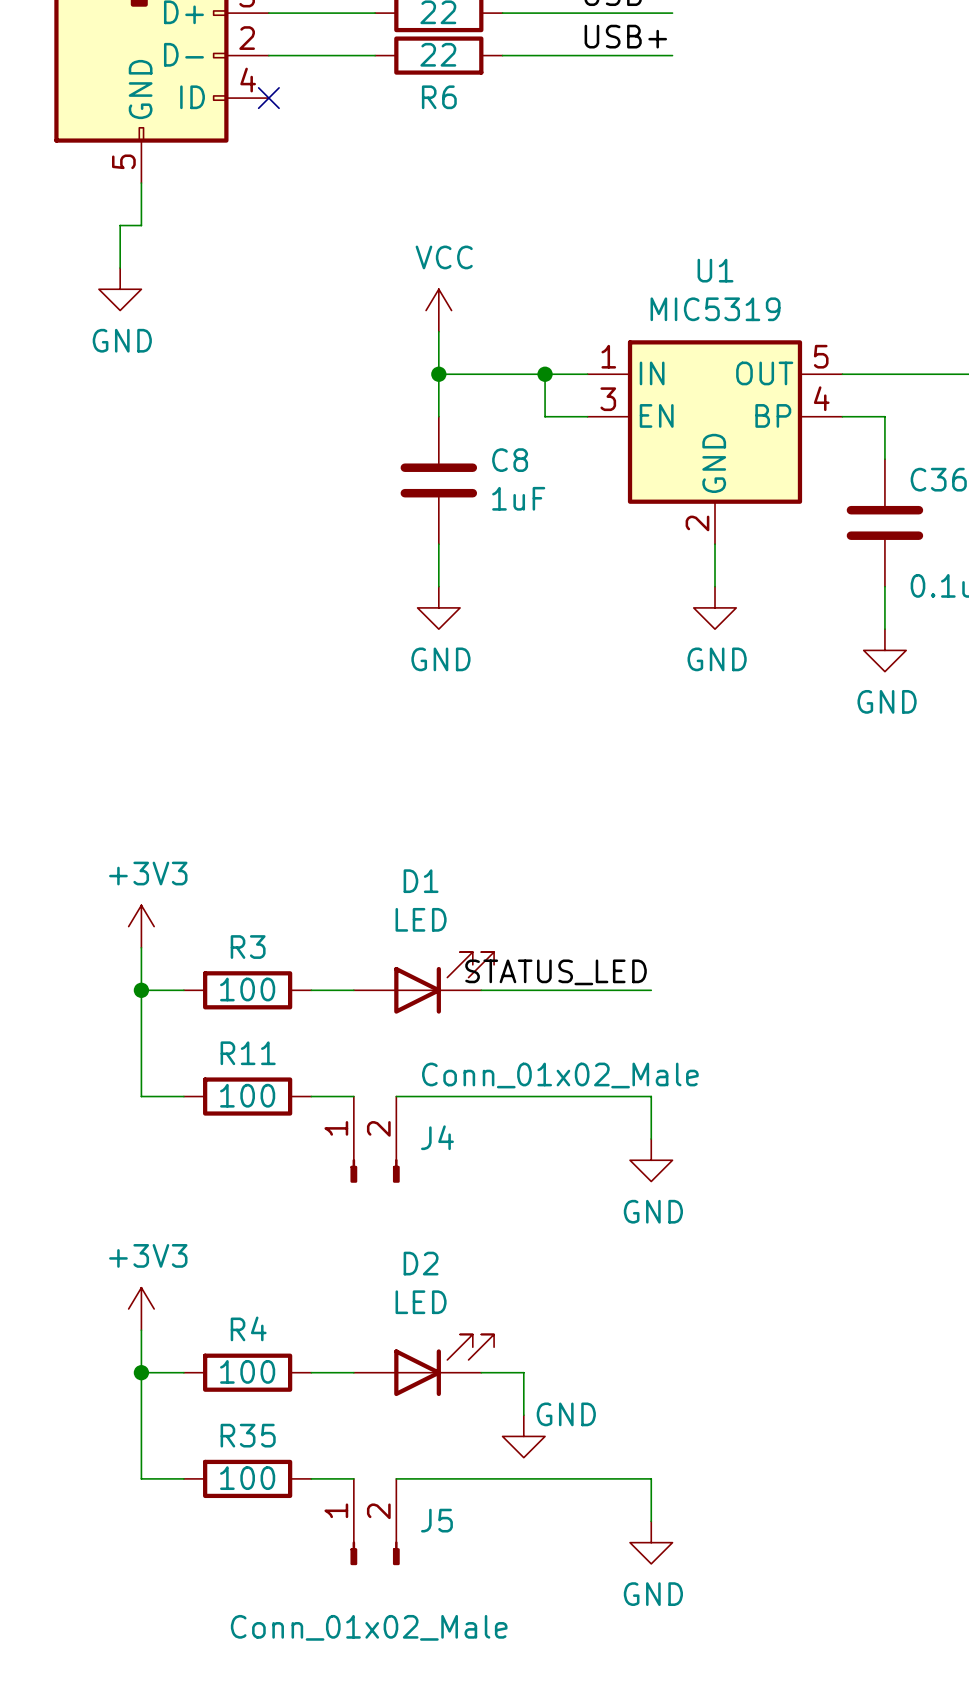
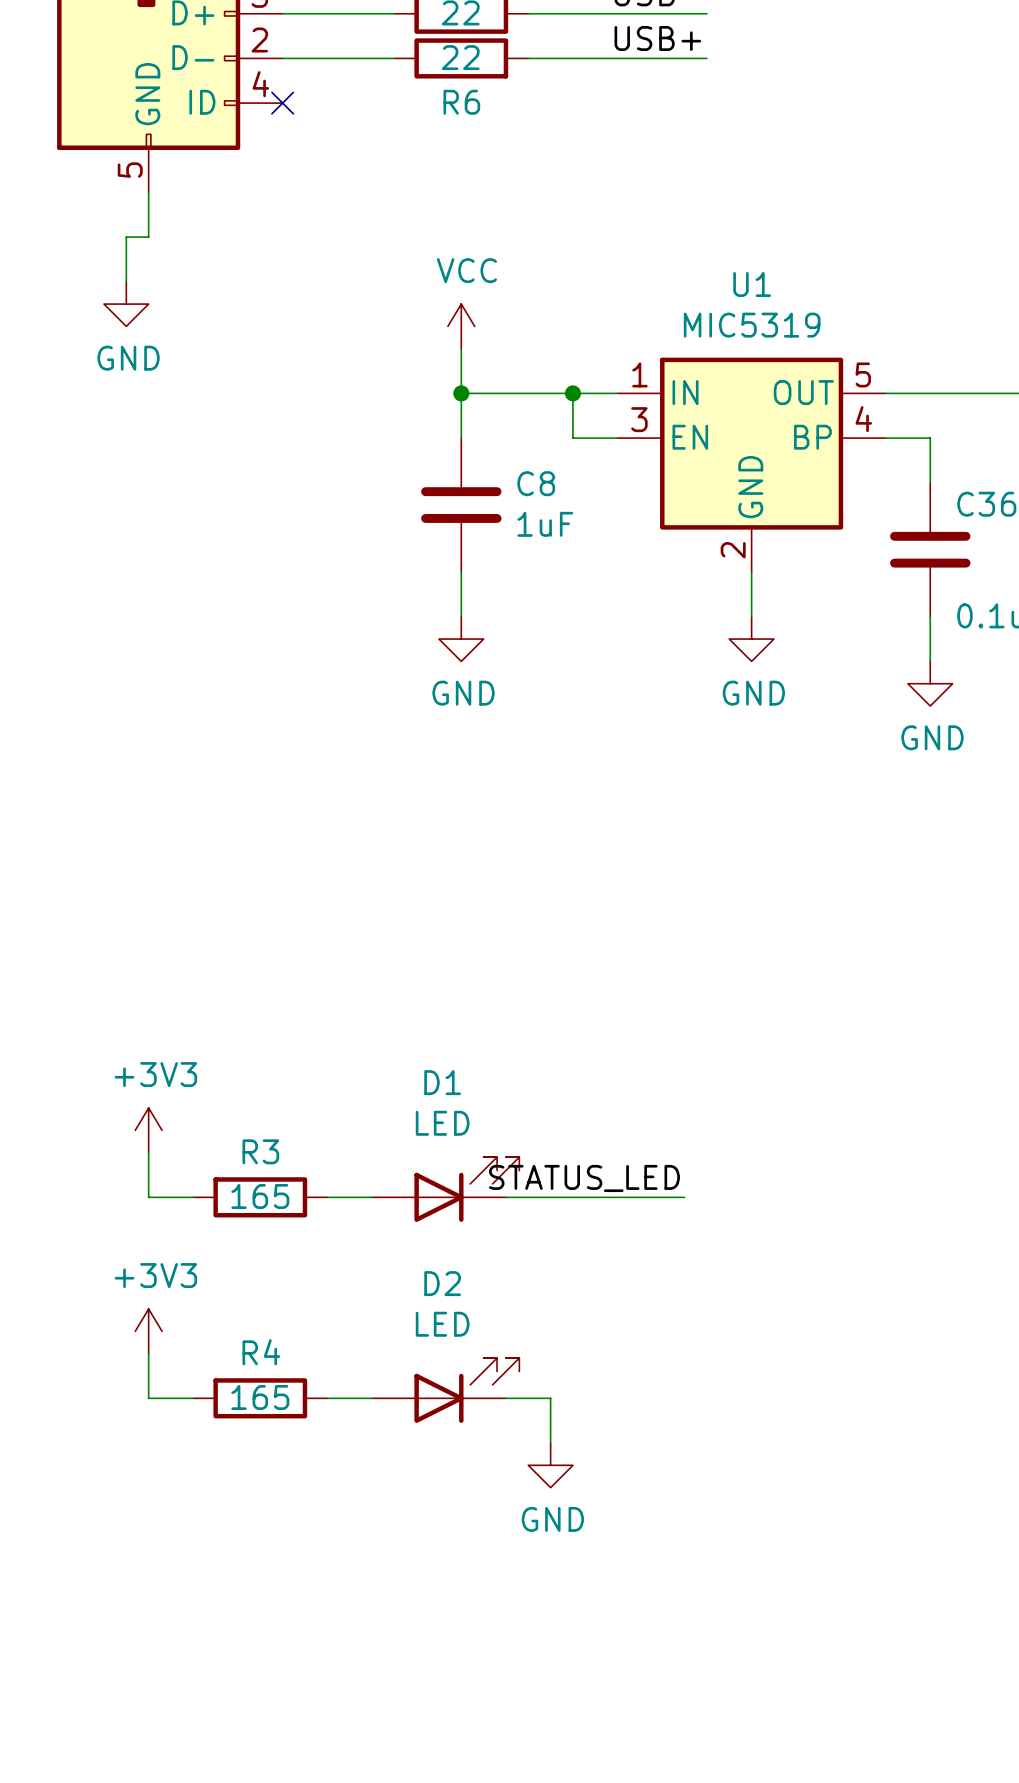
power symbol: +3V3 (141, 926) -> none
wire: (141, 947) (141, 1096) (183, 1096) -> none
label position: STATUS_LED (556, 972) -> STATUS_LED (584, 1178)
D1 position: (423, 982) -> (445, 1189)
R3 value: 100 (247, 989) -> 165 (260, 1196)
wire: (141, 990) (183, 990) -> none
junction: (141, 990) -> none
R3 position: (247, 990) -> (260, 1197)
wire: (311, 990) (353, 990) -> (327, 1197) (371, 1197)
wire: (481, 990) (651, 990) -> none
power symbol: none -> +3V3 (148, 1130)
wire: none -> (148, 1152) (148, 1197) (193, 1197)
R11: 100 (247, 1096) -> none
wire: (311, 1096) (353, 1096) -> none
wire: (396, 1096) (651, 1096) (651, 1139) -> (505, 1197) (684, 1197)
J4: Conn_01x02_Male (375, 1139) -> none
power symbol: GND (651, 1160) -> none
wire: none -> (148, 1353) (148, 1398) (193, 1398)
power symbol position: +3V3 (141, 1308) -> +3V3 (148, 1331)
wire: (141, 1330) (141, 1478) (183, 1478) -> none
D2 position: (423, 1365) -> (445, 1390)
R4 value: 100 (247, 1371) -> 165 (260, 1397)
wire: (141, 1372) (183, 1372) -> none
junction: (141, 1372) -> none
R4 position: (247, 1372) -> (260, 1398)
wire: (311, 1372) (353, 1372) -> (327, 1398) (371, 1398)
wire: (481, 1372) (523, 1372) (523, 1415) -> (505, 1398) (550, 1398) (550, 1442)
power symbol text position: GND (566, 1414) -> GND (552, 1519)
power symbol position: GND (523, 1436) -> GND (550, 1465)
R35: 100 (247, 1478) -> none
wire: (311, 1478) (353, 1478) -> none
wire: (396, 1478) (651, 1478) (651, 1521) -> none
J5: Conn_01x02_Male (375, 1522) -> none
power symbol: GND (651, 1542) -> none

